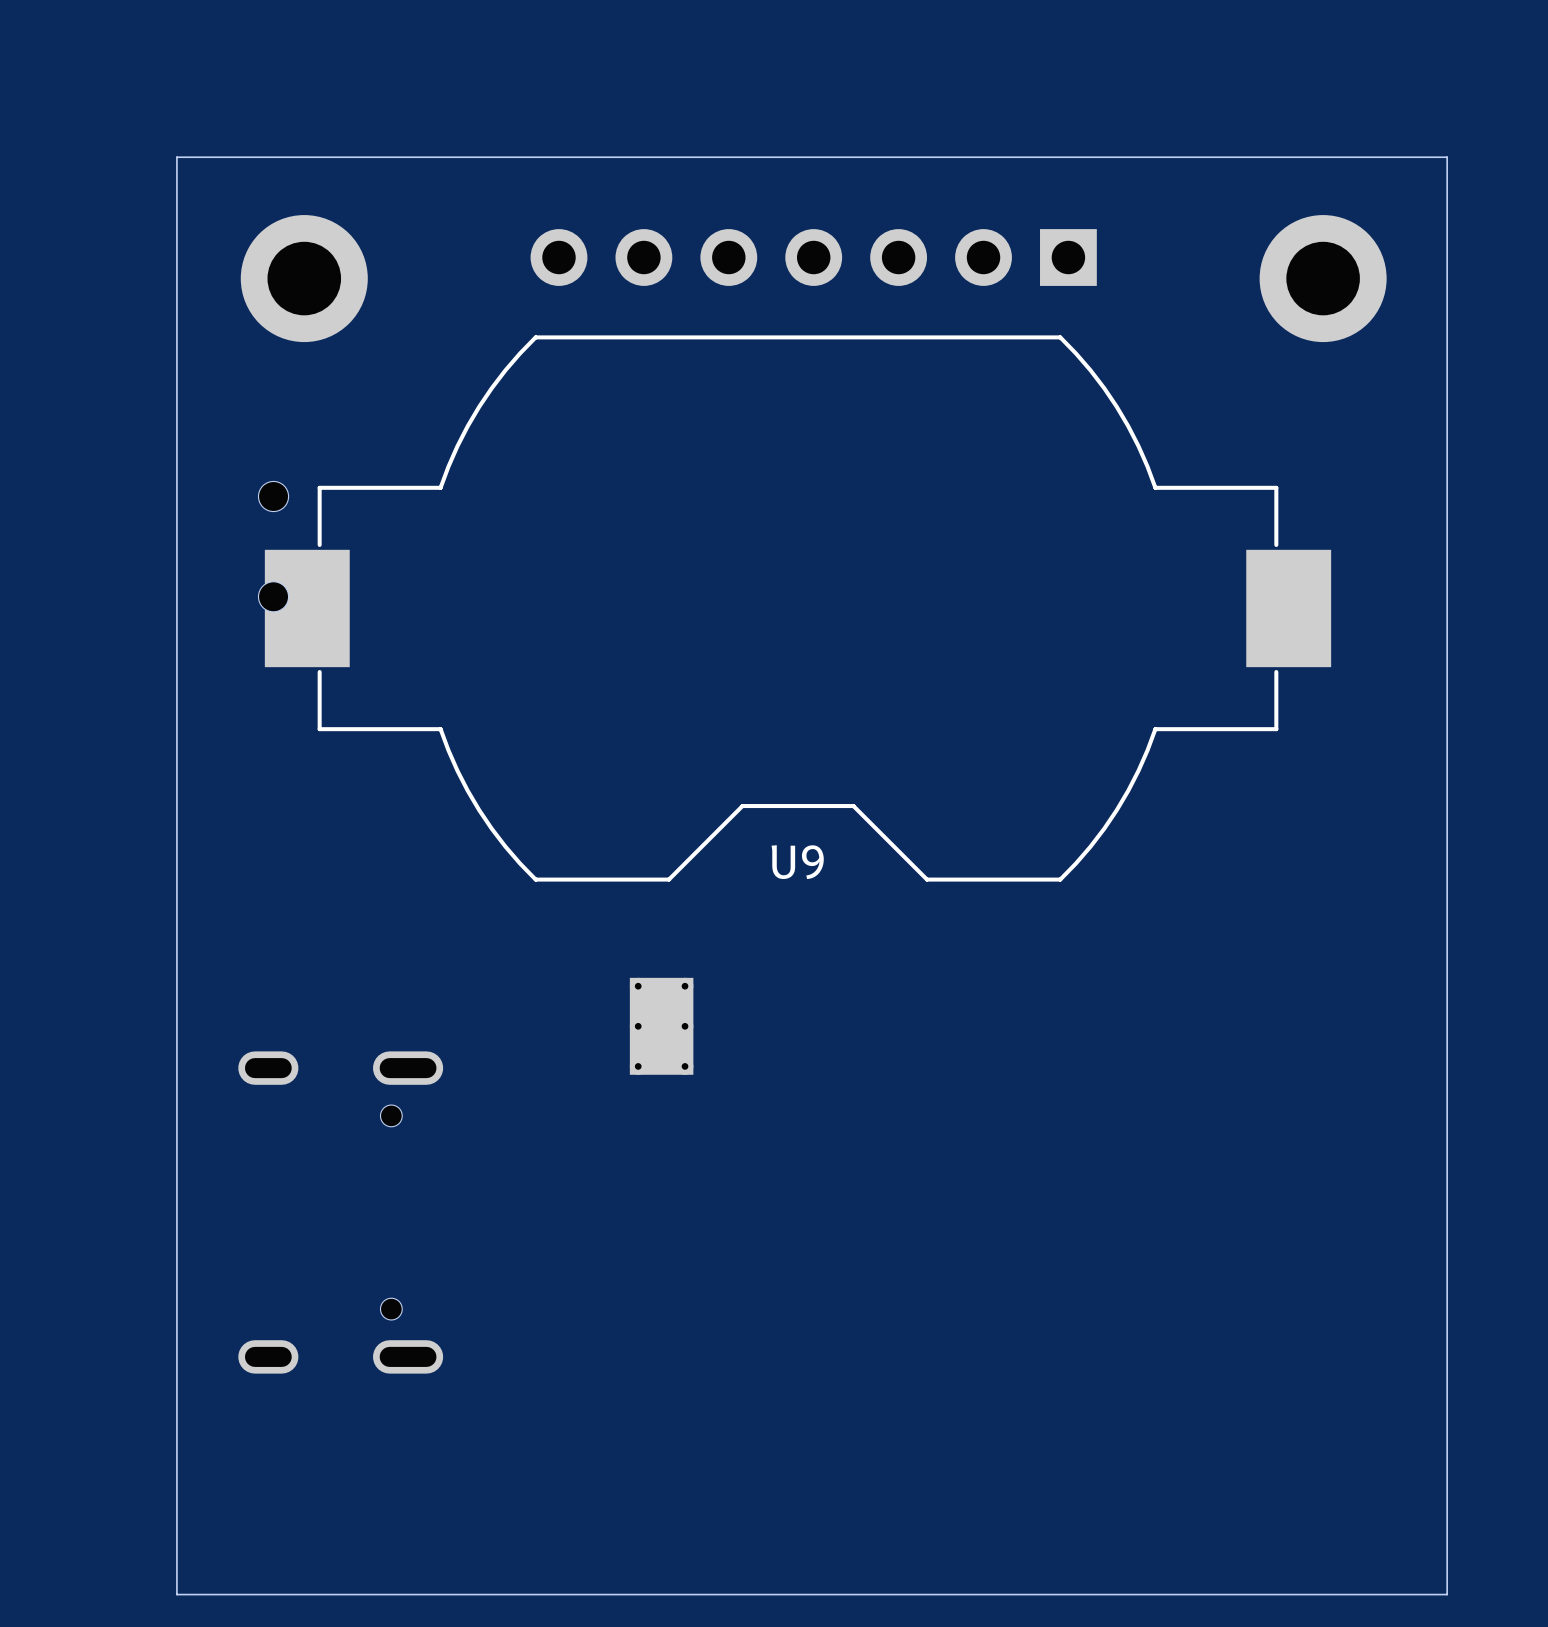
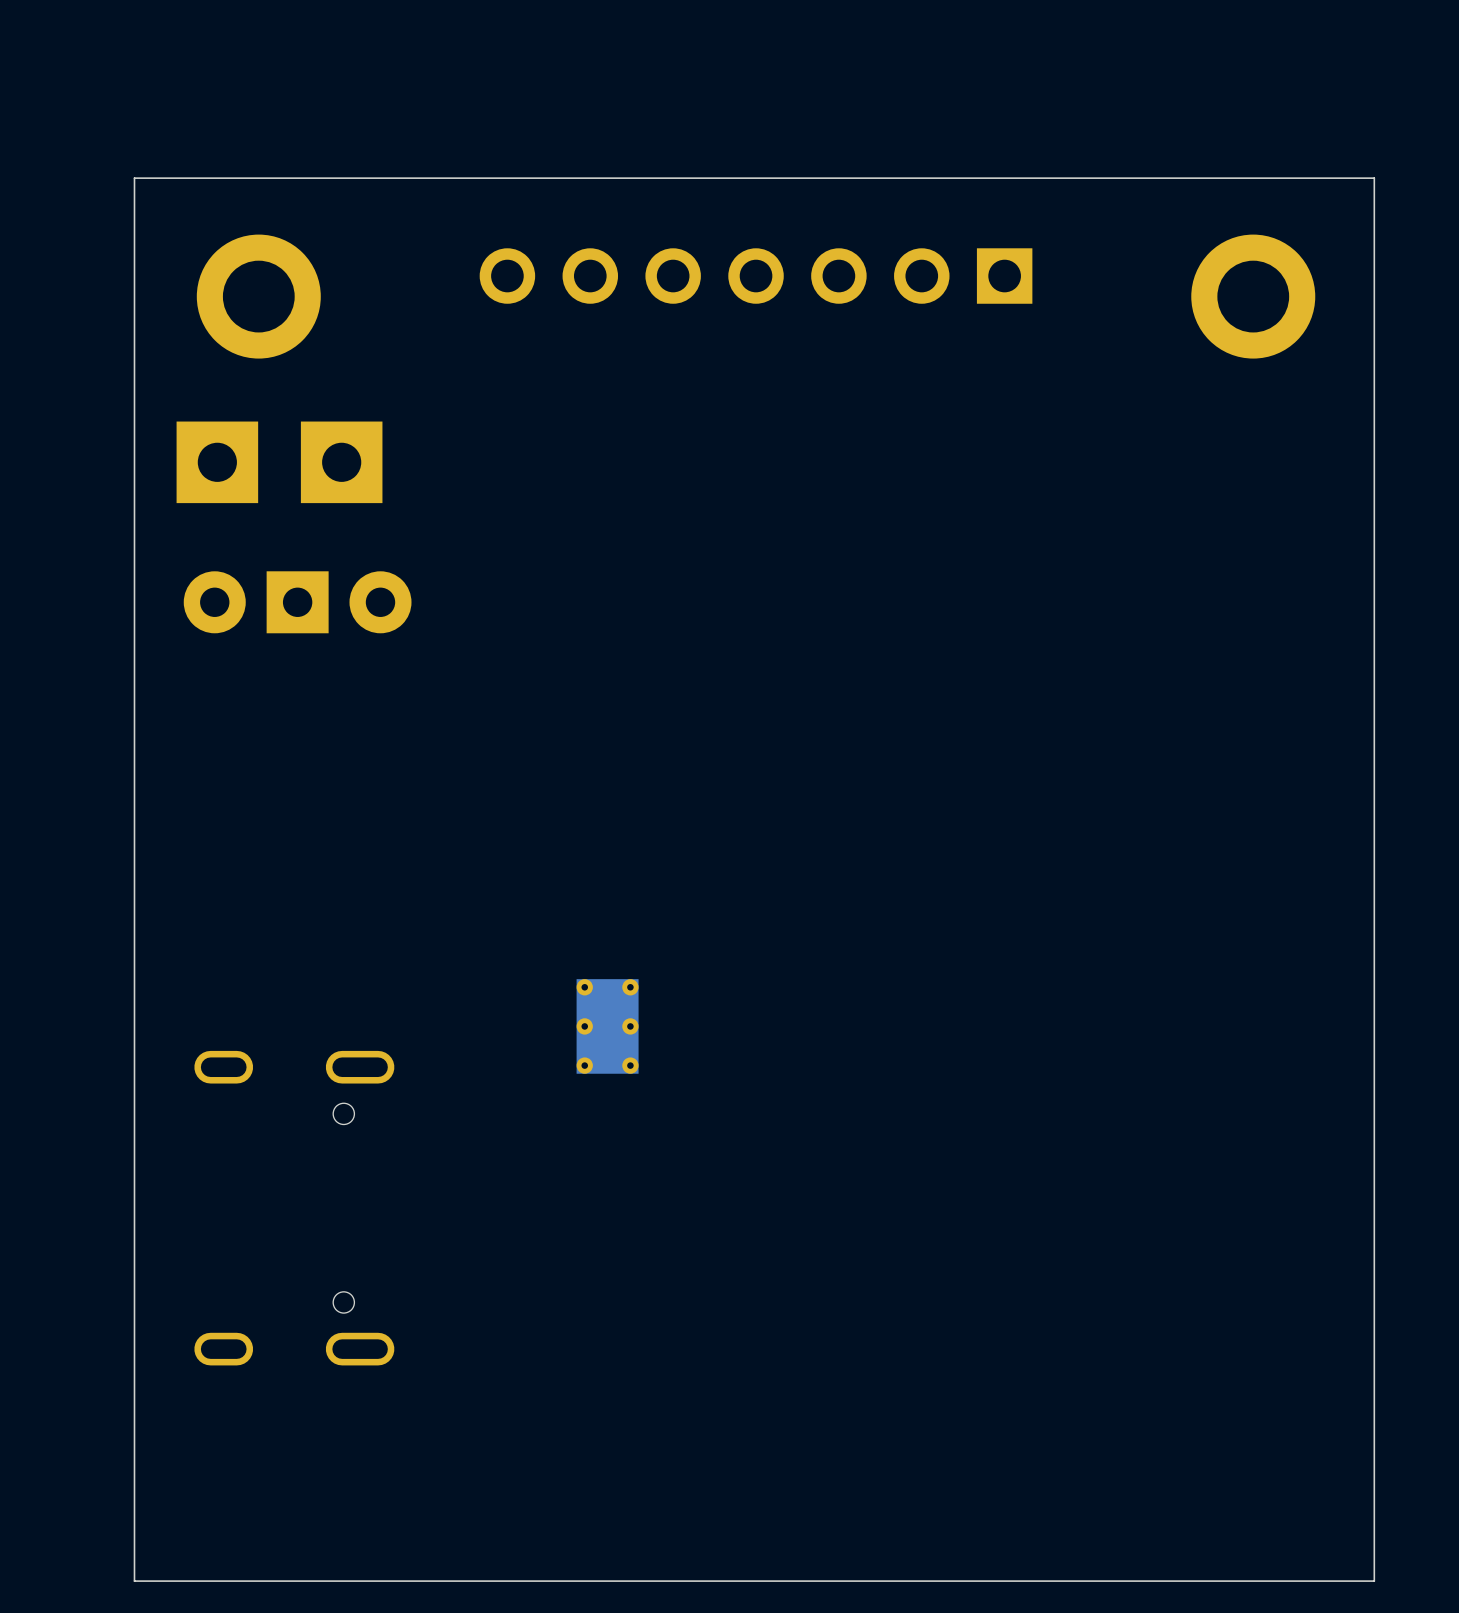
part: none -> (217, 462)
part: none -> (341, 462)
part: (273, 546) -> none
part: none -> (297, 602)
U9: (798, 608) -> none

